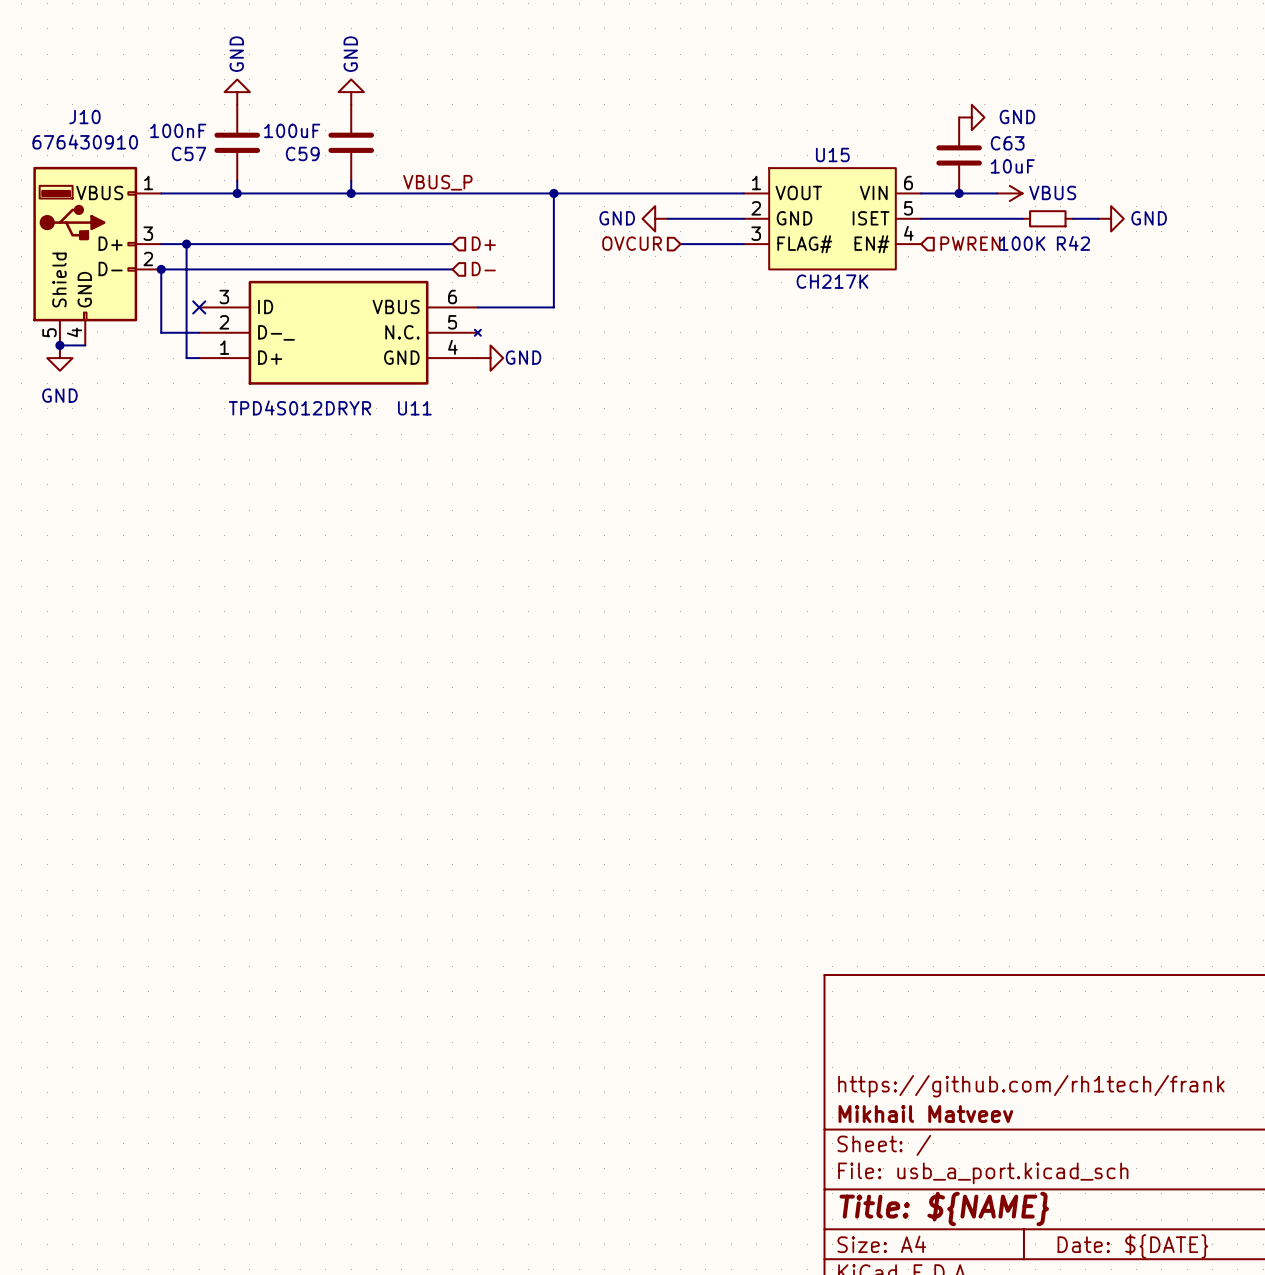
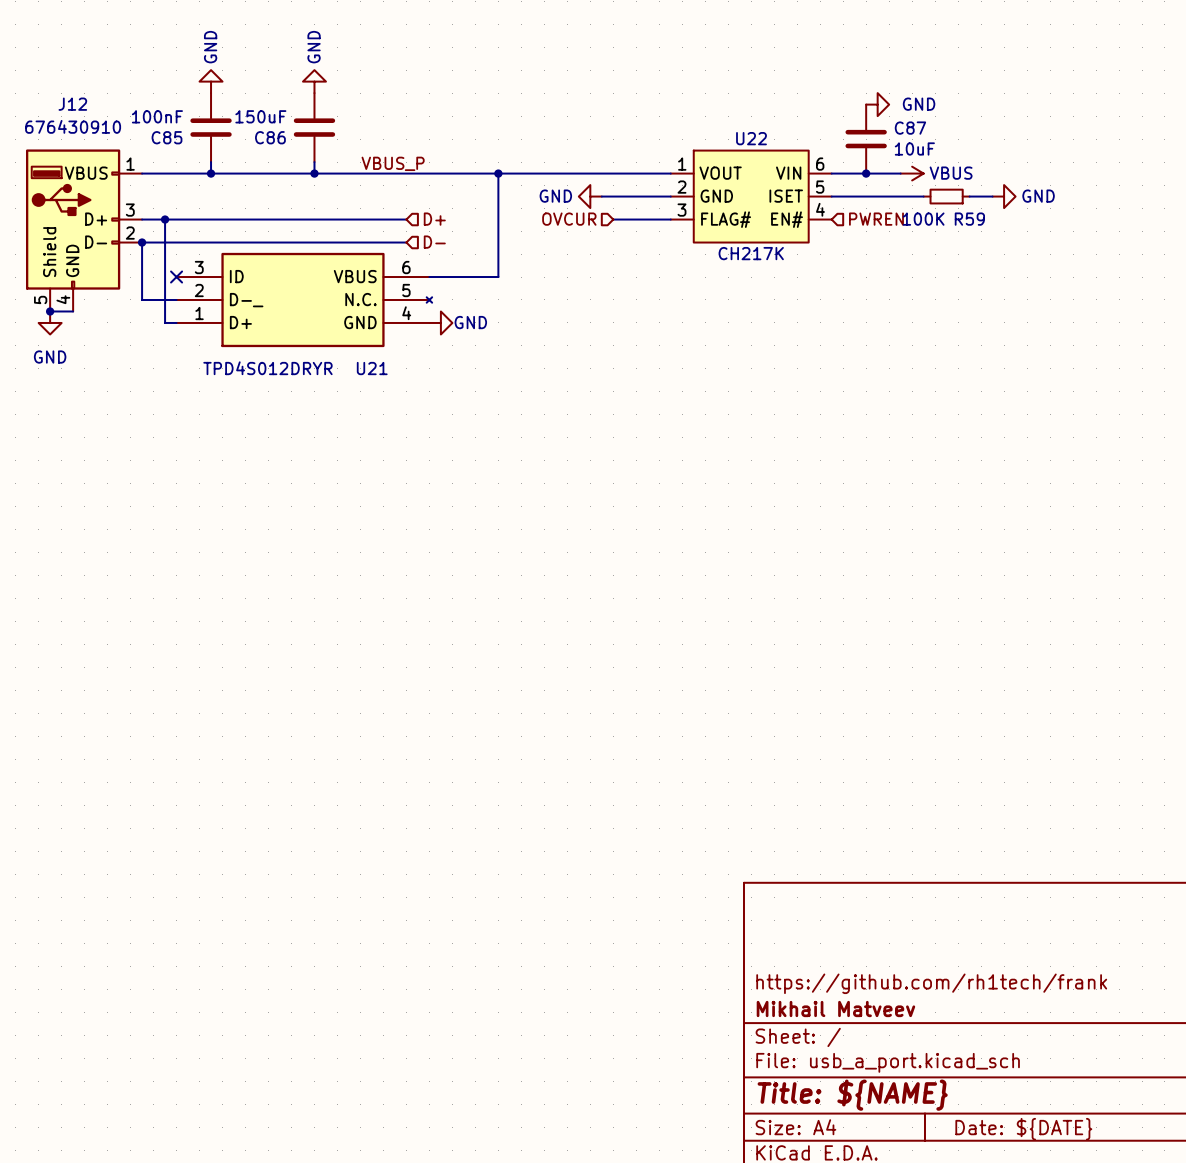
J10 name: J10 (84, 116) -> J12 (72, 104)
C59 value: 100uF (292, 130) -> 150uF (260, 116)
C63 name: C63 (1007, 143) -> C87 (910, 128)
C57 name: C57 (189, 153) -> C85 (167, 137)
C59 name: C59 (302, 153) -> C86 (270, 137)
U15 name: U15 (832, 154) -> U22 (751, 138)
R42 name: R42 (1073, 243) -> R59 (969, 219)
U11 name: U11 (414, 408) -> U21 (372, 368)

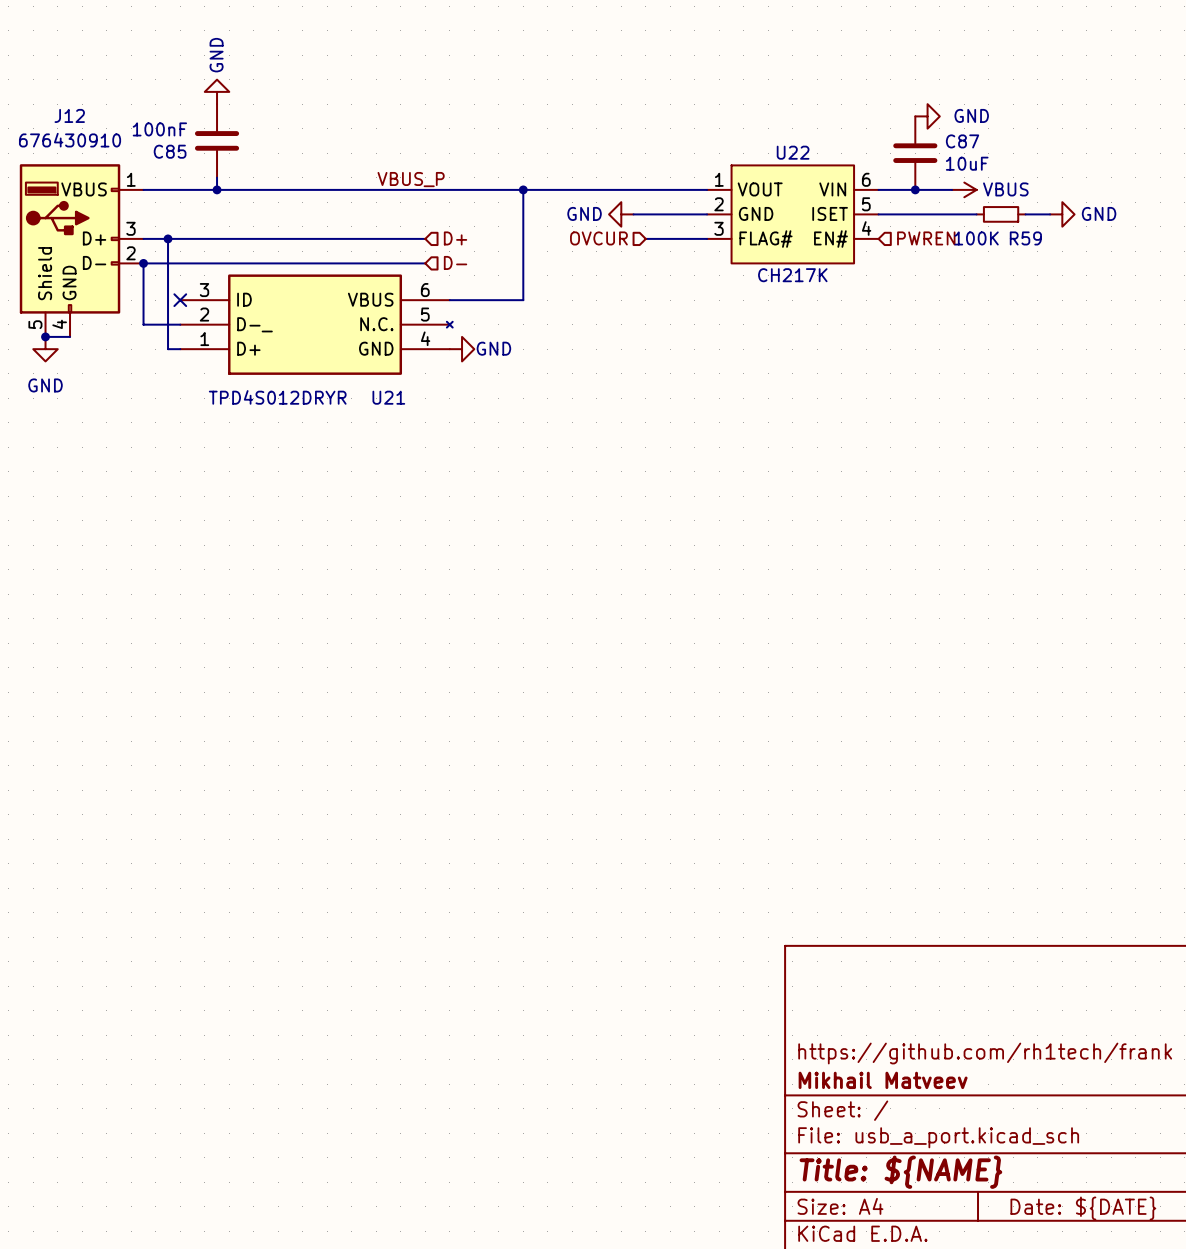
power symbol: GND (314, 81) -> none
C86: 150uF (314, 127) -> none
wire: (314, 162) (314, 173) -> none
junction: (314, 173) -> none

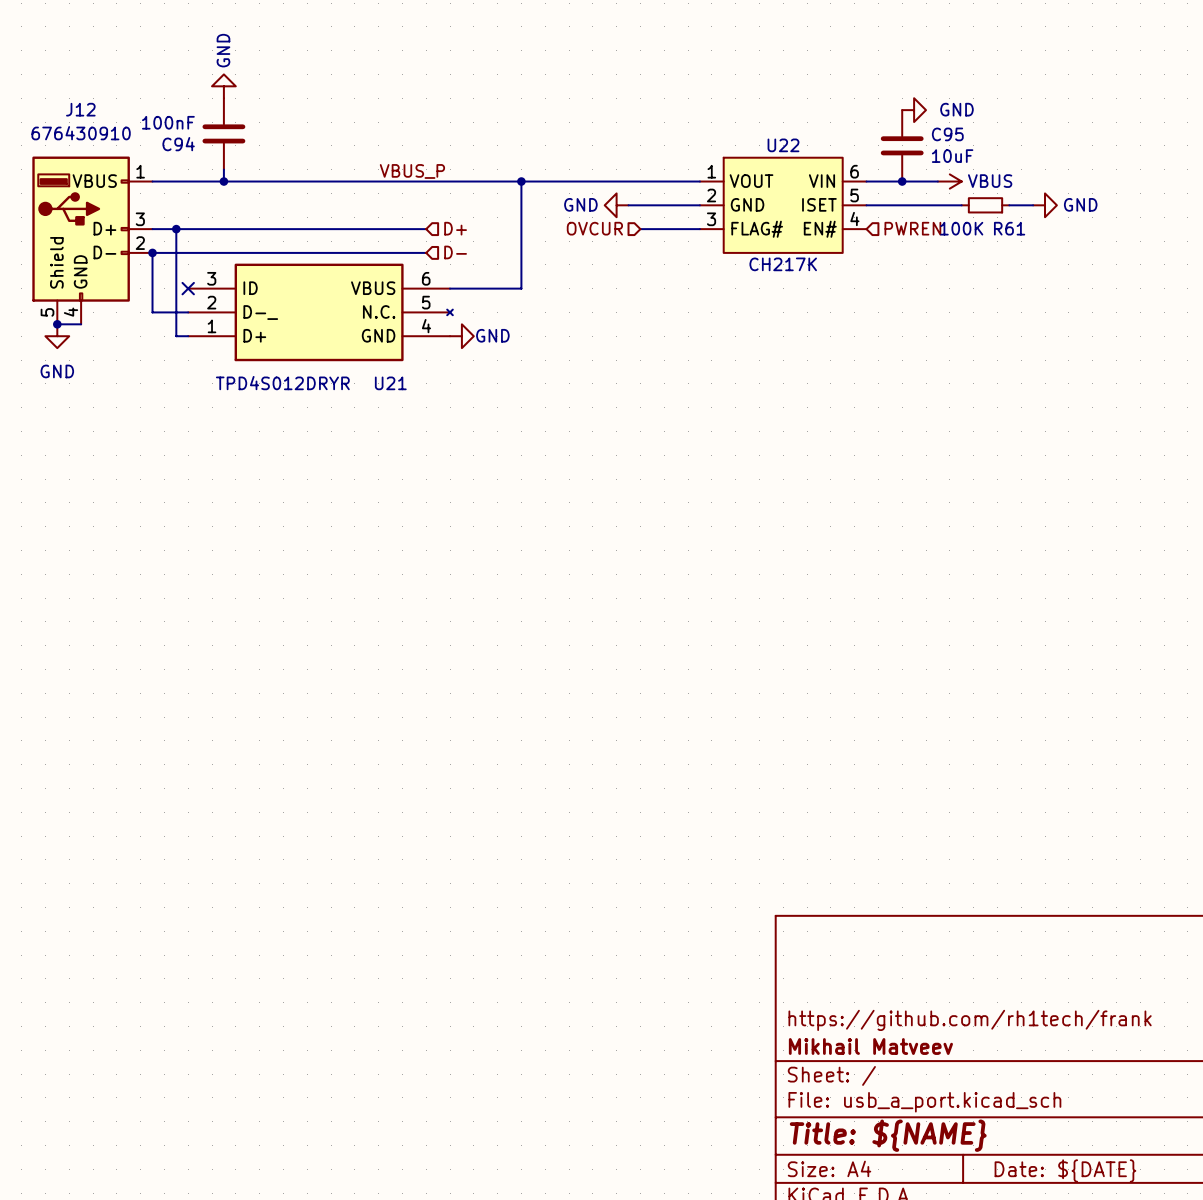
C87 name: C87 (962, 141) -> C95 (947, 134)
C85 name: C85 (170, 151) -> C94 (178, 144)
R59 name: R59 (1025, 238) -> R61 (1009, 228)

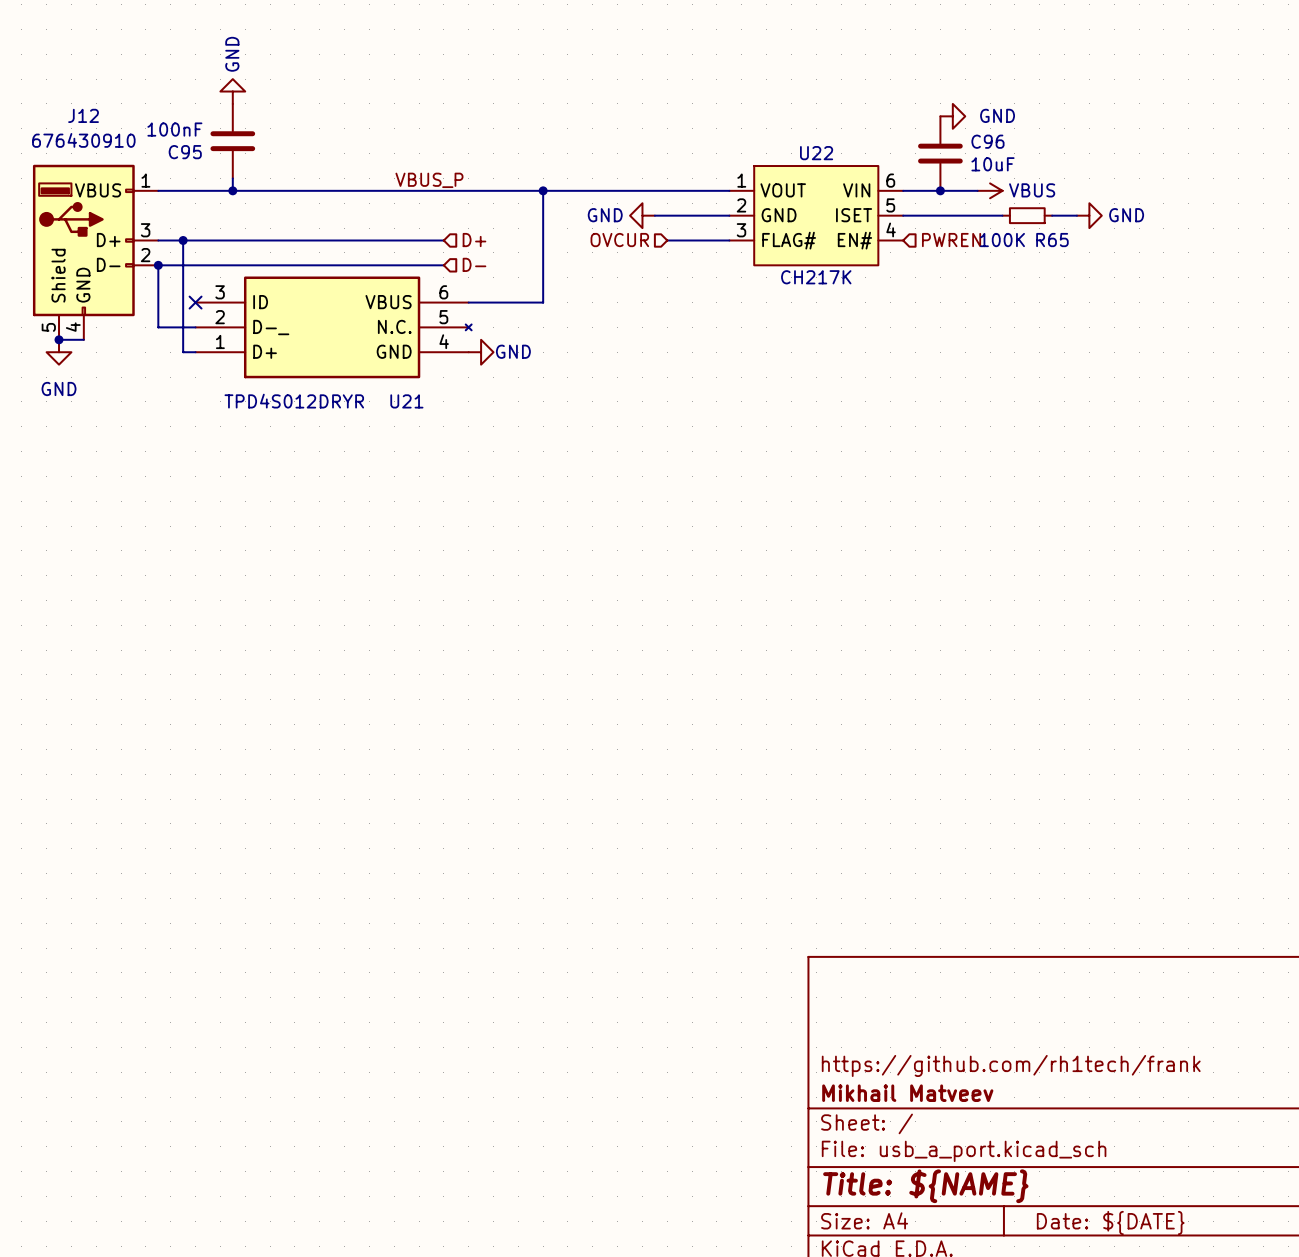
C95 name: C95 (947, 134) -> C96 (987, 141)
C94 name: C94 (178, 144) -> C95 (185, 152)
R61 name: R61 (1009, 228) -> R65 (1052, 240)

